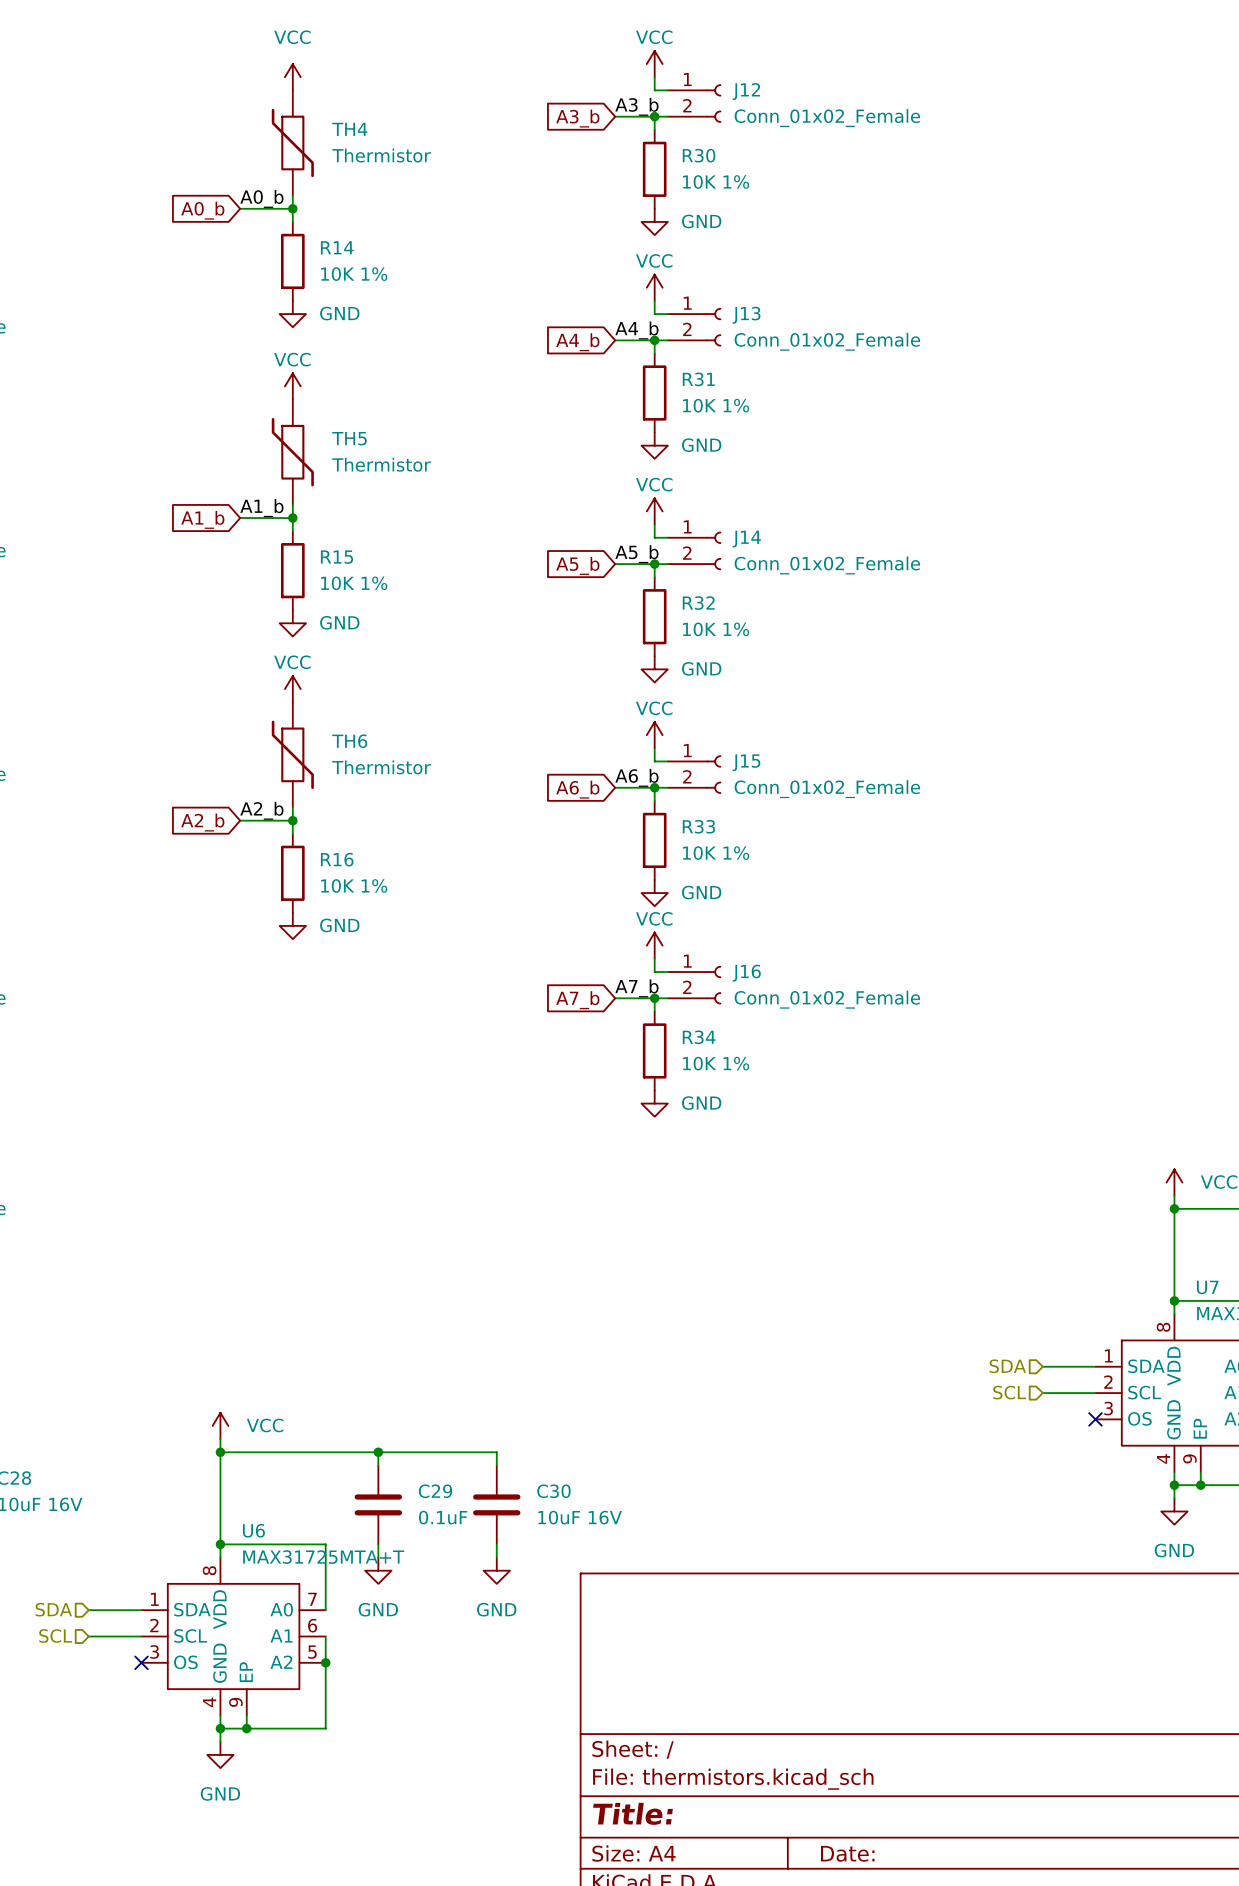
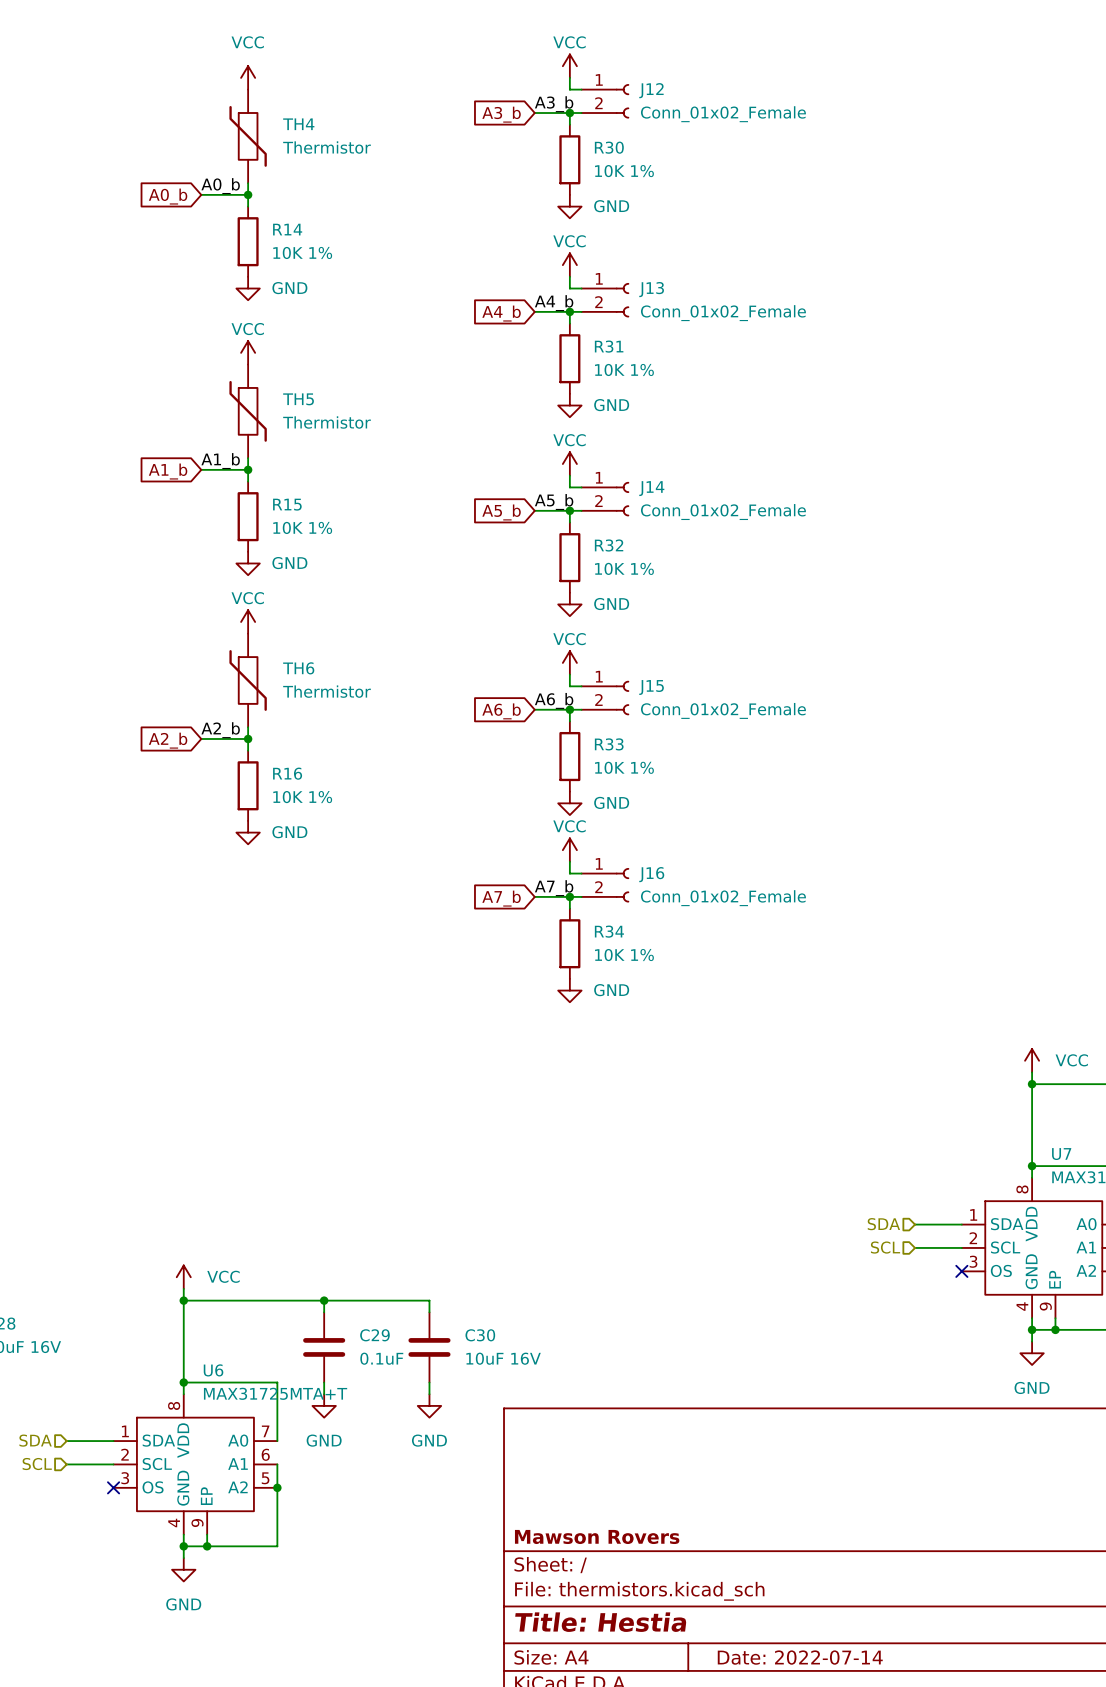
title block: none -> Mawson Rovers (597, 1536)
title block: Title: (633, 1813) -> Title: Hestia (600, 1622)
title block: Date: (847, 1853) -> Date: 2022-07-14 (800, 1657)

